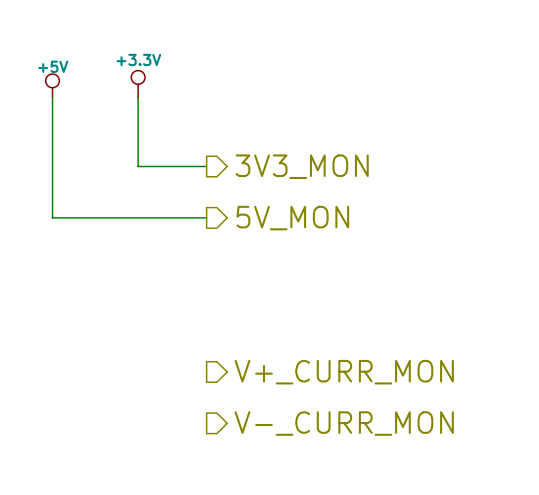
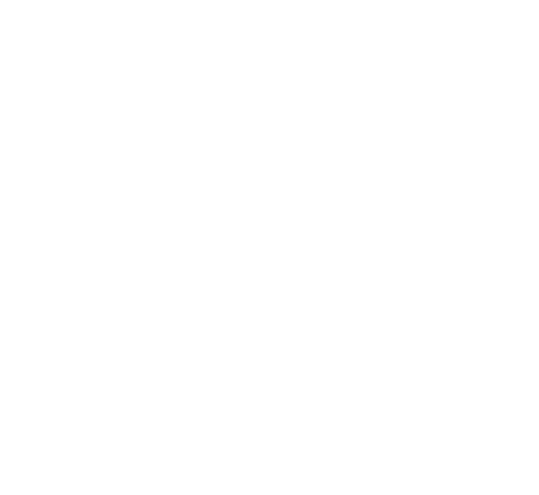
power symbol: +3.3V (138, 84) -> none
power symbol: +5V (52, 86) -> none
wire: (52, 98) (52, 217) (206, 217) -> none
wire: (138, 98) (138, 166) (206, 166) -> none
hierarchical label: 3V3_MON (302, 166) -> none
hierarchical label: 5V_MON (292, 218) -> none
hierarchical label: V+_CURR_MON (344, 372) -> none
hierarchical label: V-_CURR_MON (344, 423) -> none

